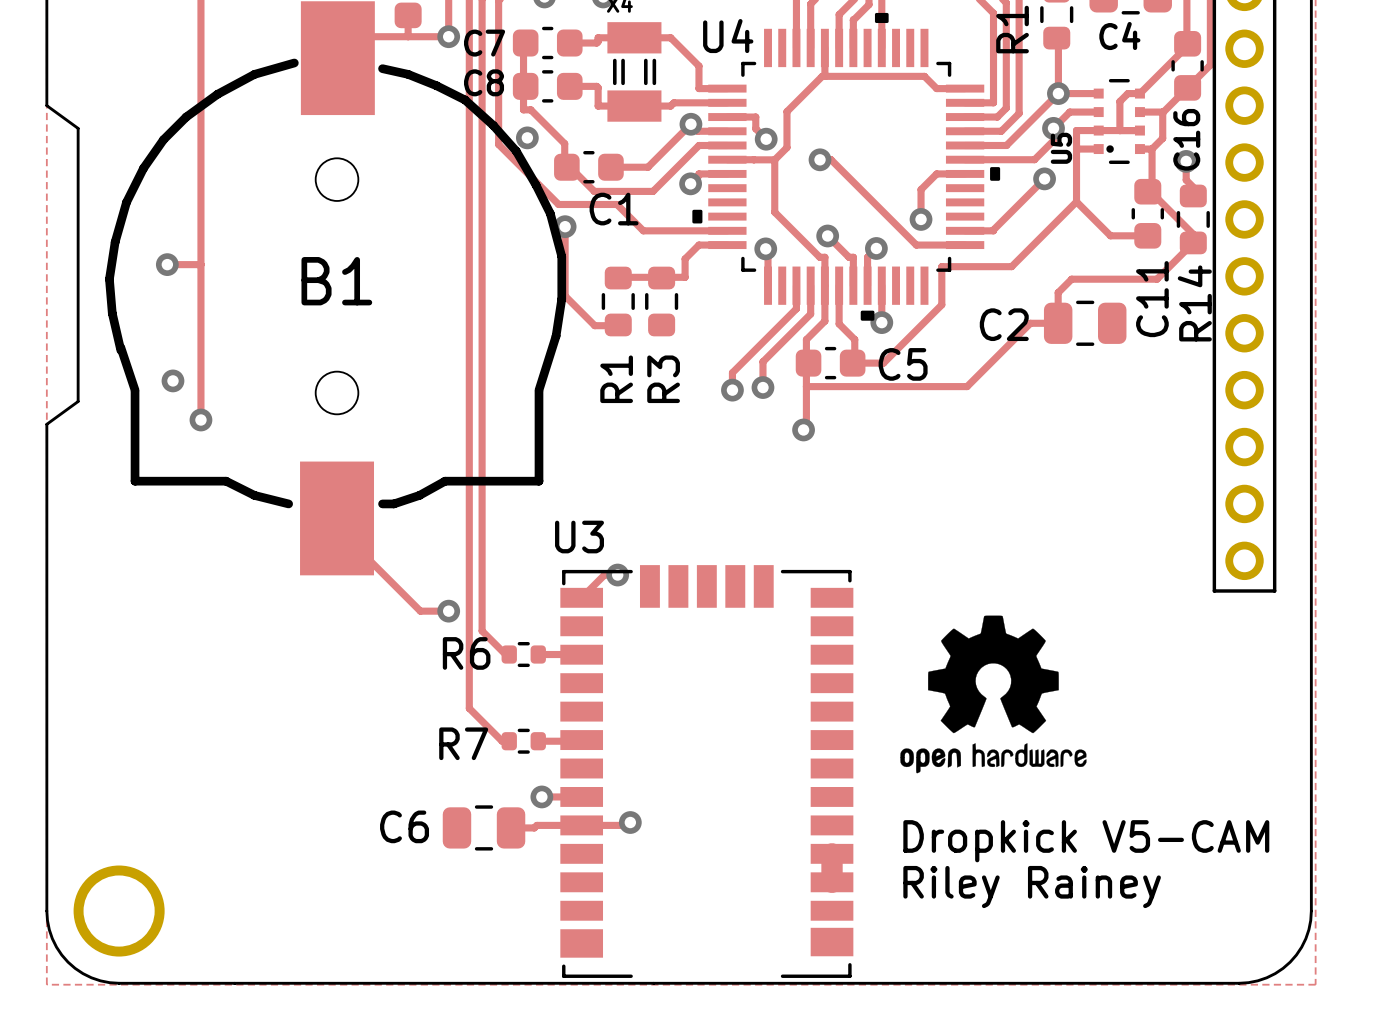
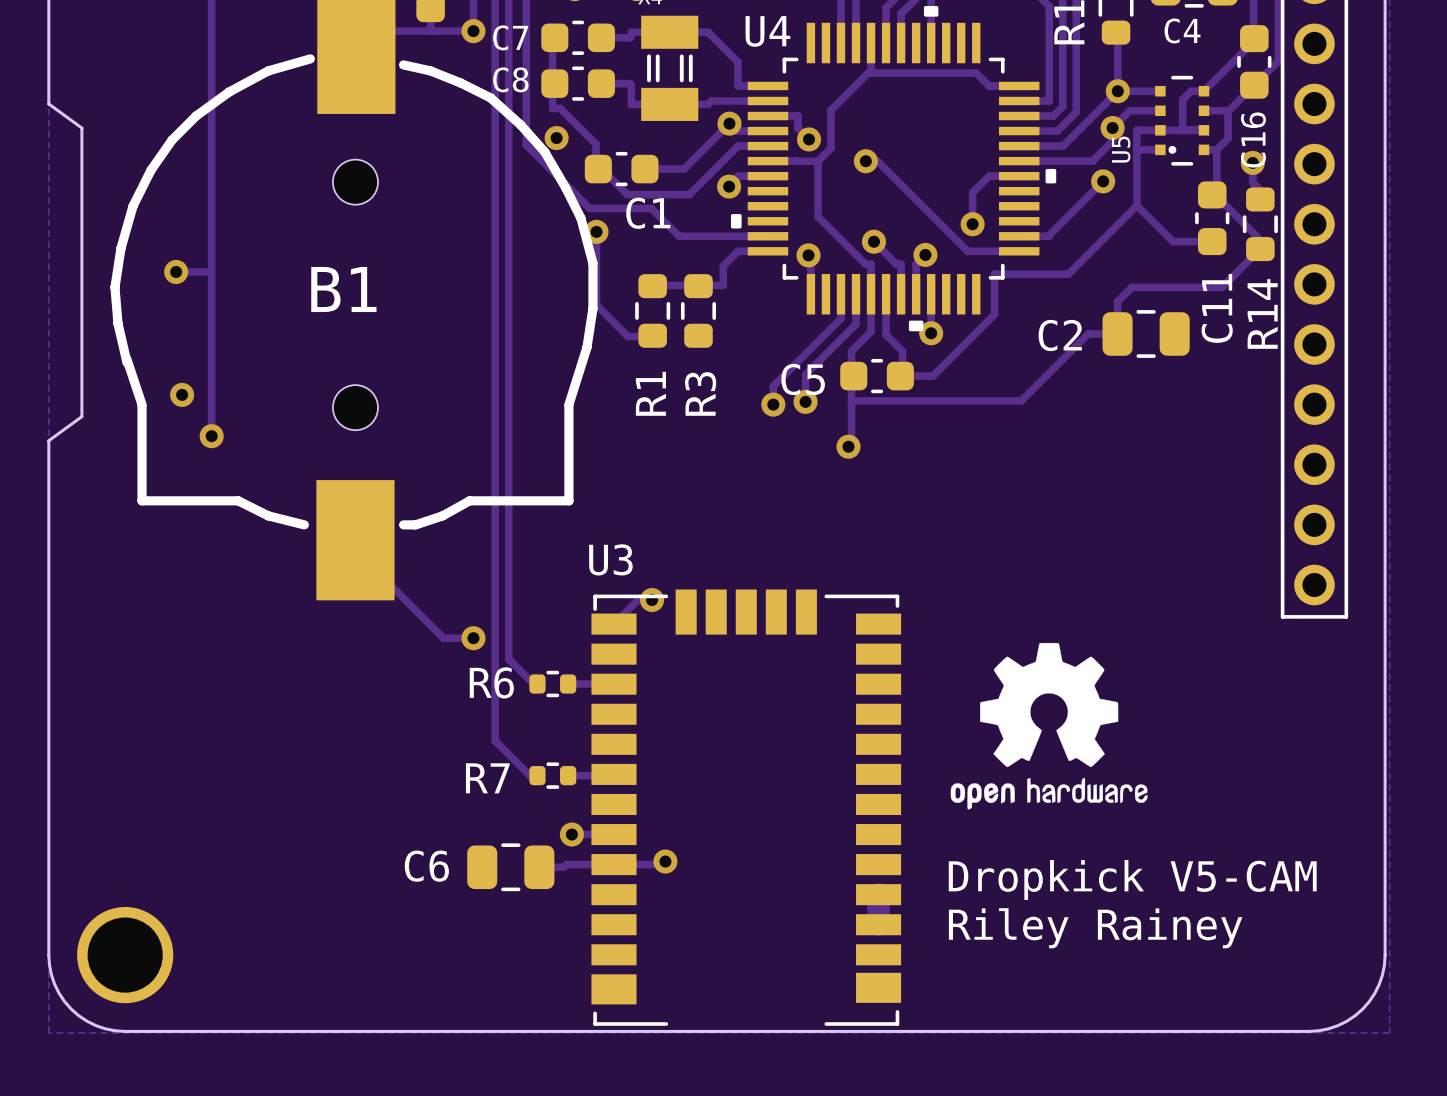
C5 name position: C5 (903, 364) -> C5 (803, 379)

